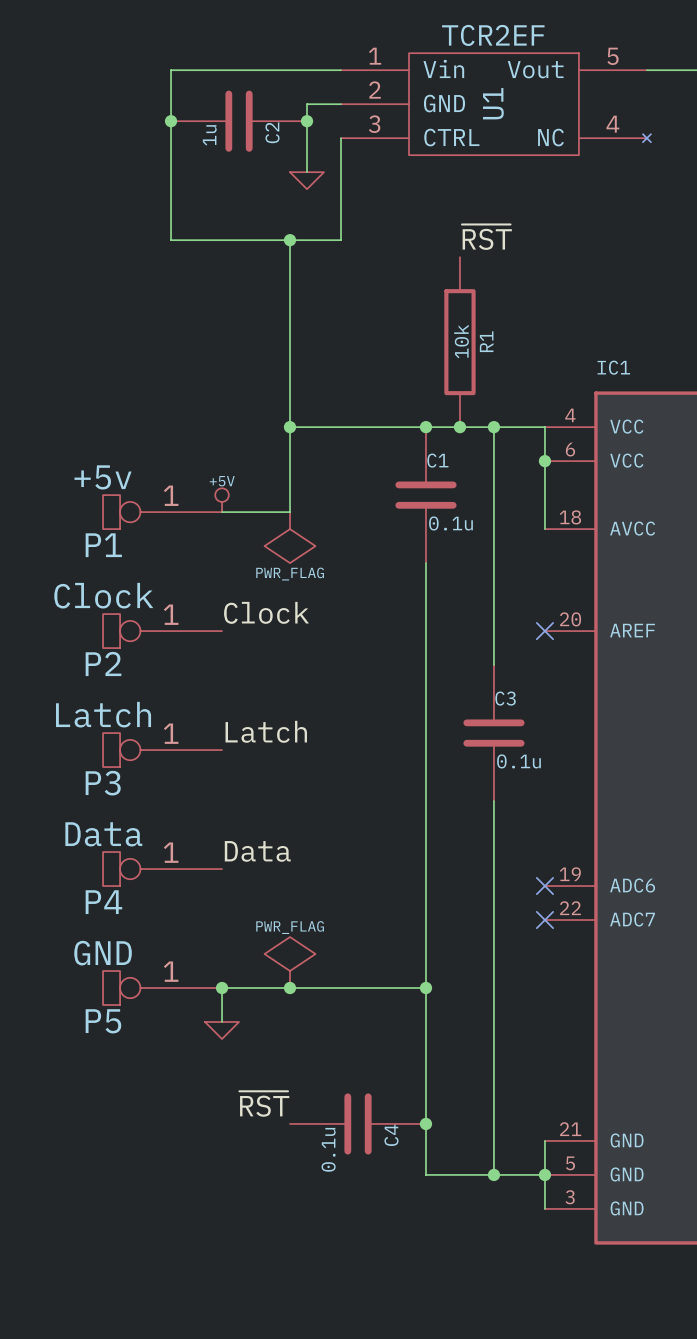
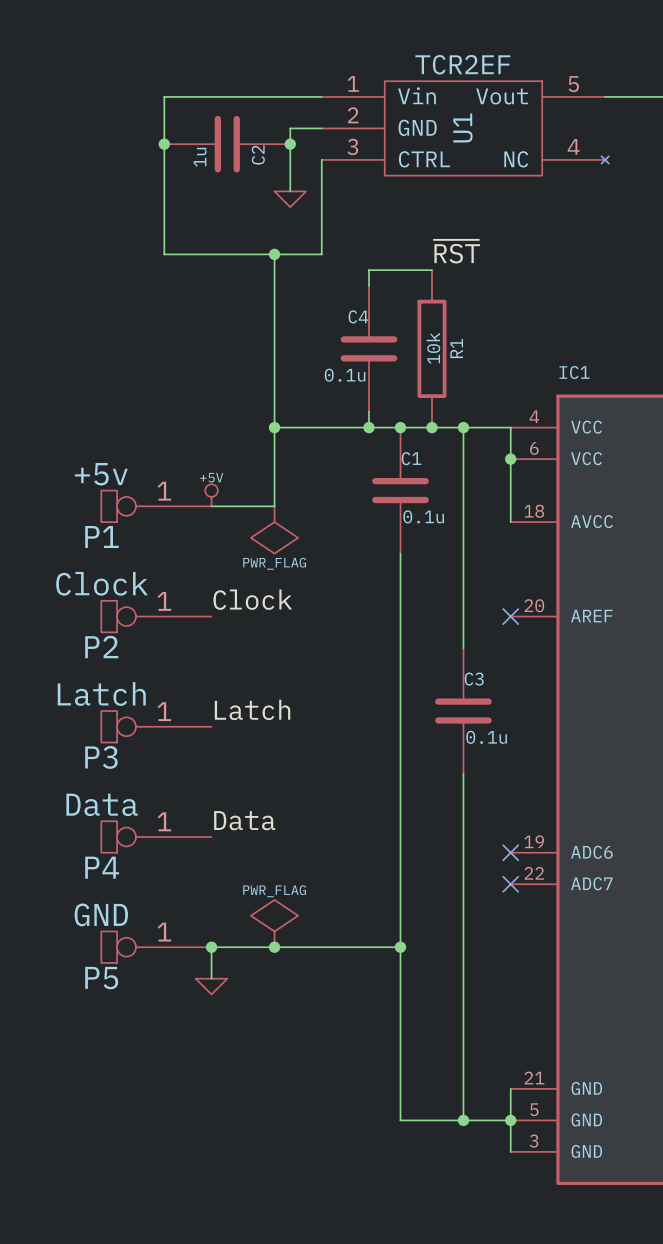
wire: none -> (431, 270) (369, 270) (369, 285)
wire: none -> (369, 411) (369, 427)
junction: none -> (369, 427)
label: ~{RST} (264, 1104) -> none
C4 rotation: 0° (358, 1123) -> 90° clockwise (369, 348)
C4 position: (358, 1123) -> (369, 348)
junction: (425, 1123) -> none
C4 name position: C4 (391, 1135) -> C4 (358, 316)

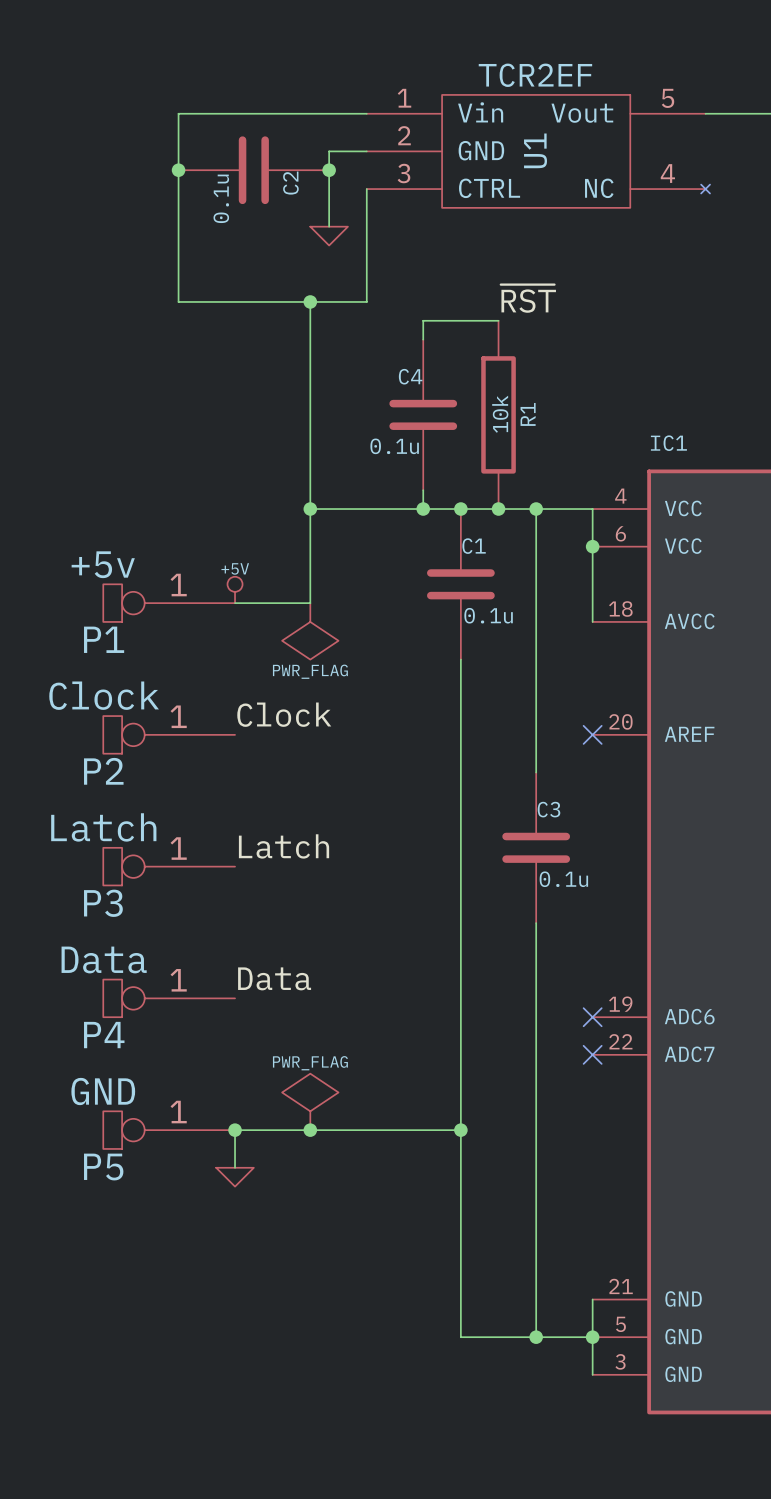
C2 value: 1u (200, 157) -> 0.1u (221, 198)

